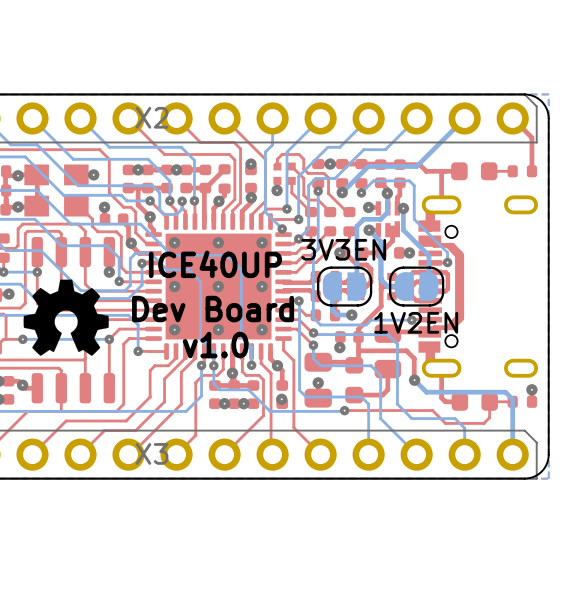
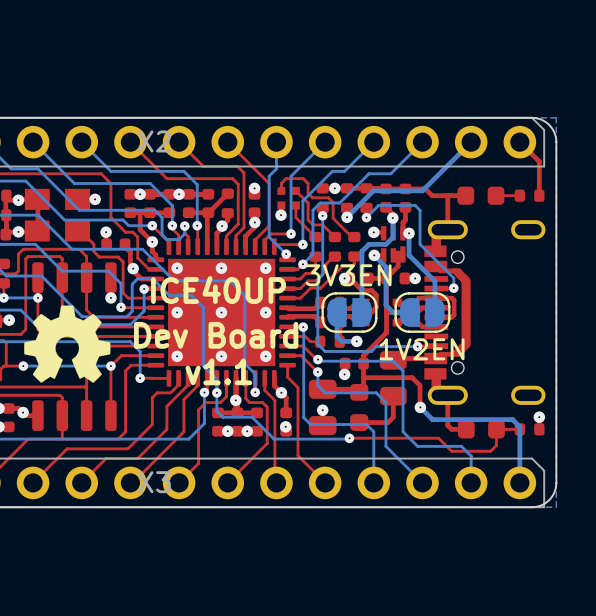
text: v1.0 (215, 345) -> v1.1 (218, 371)

